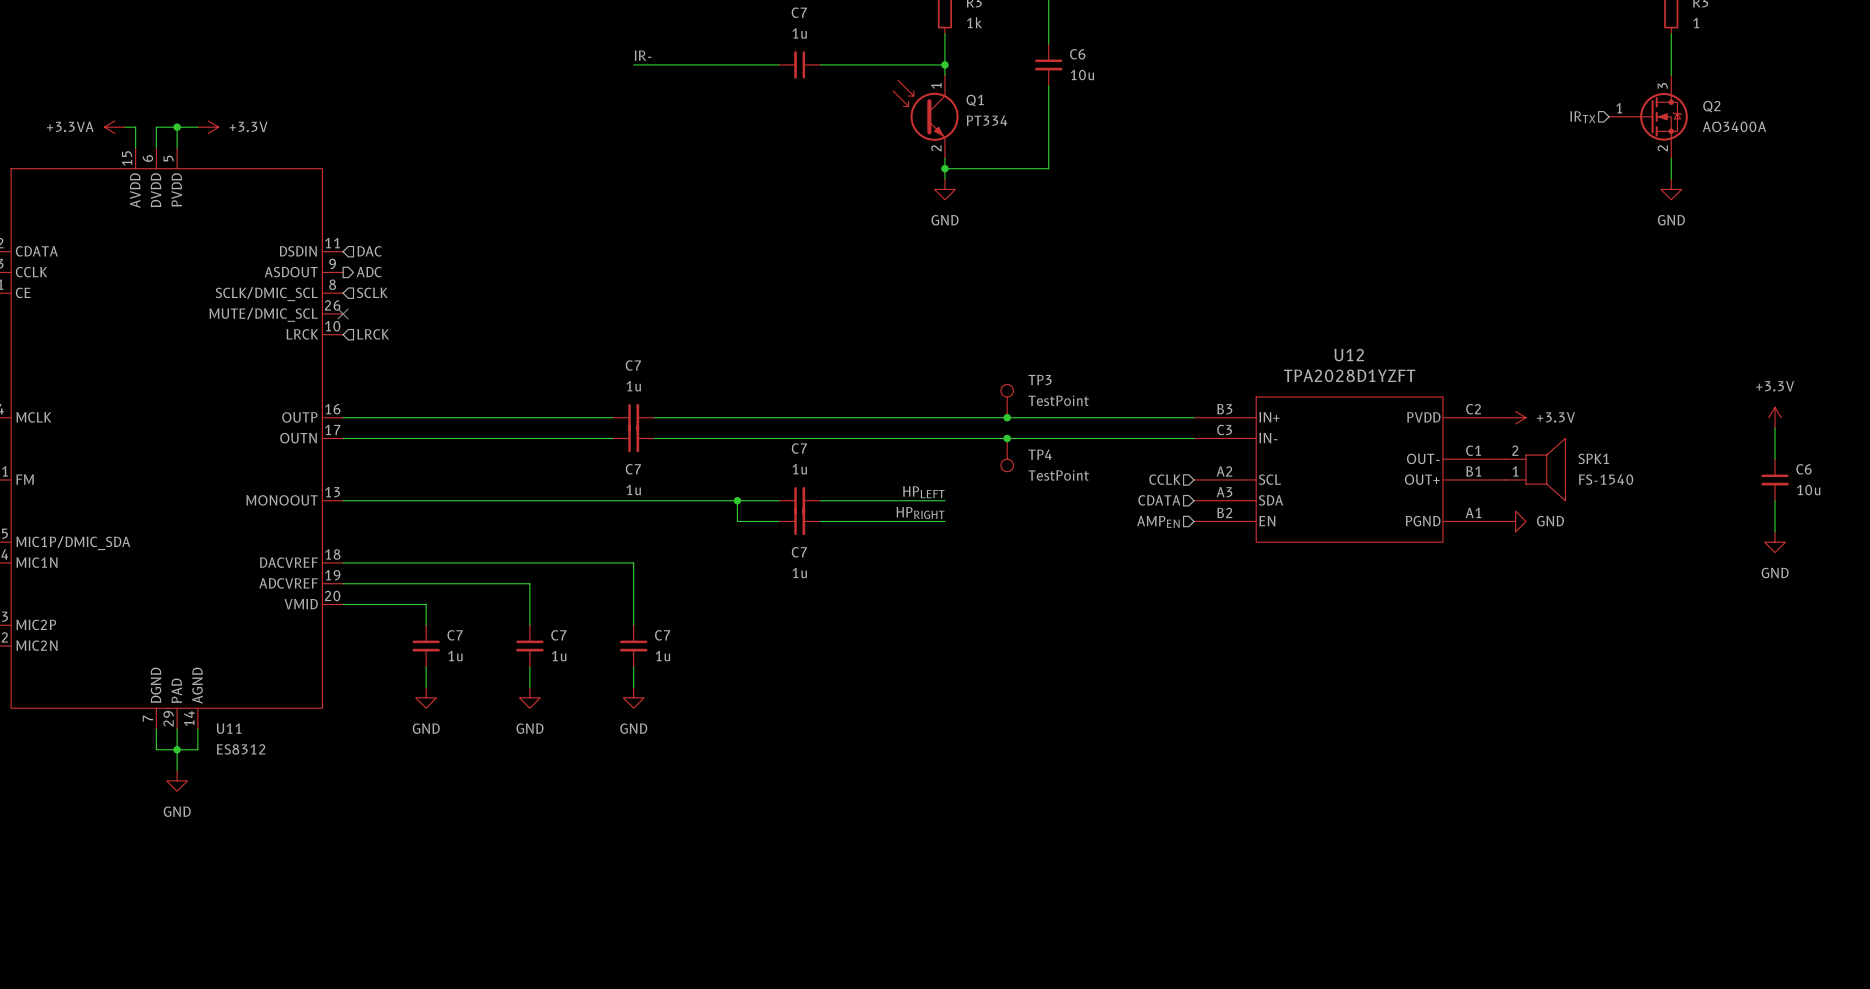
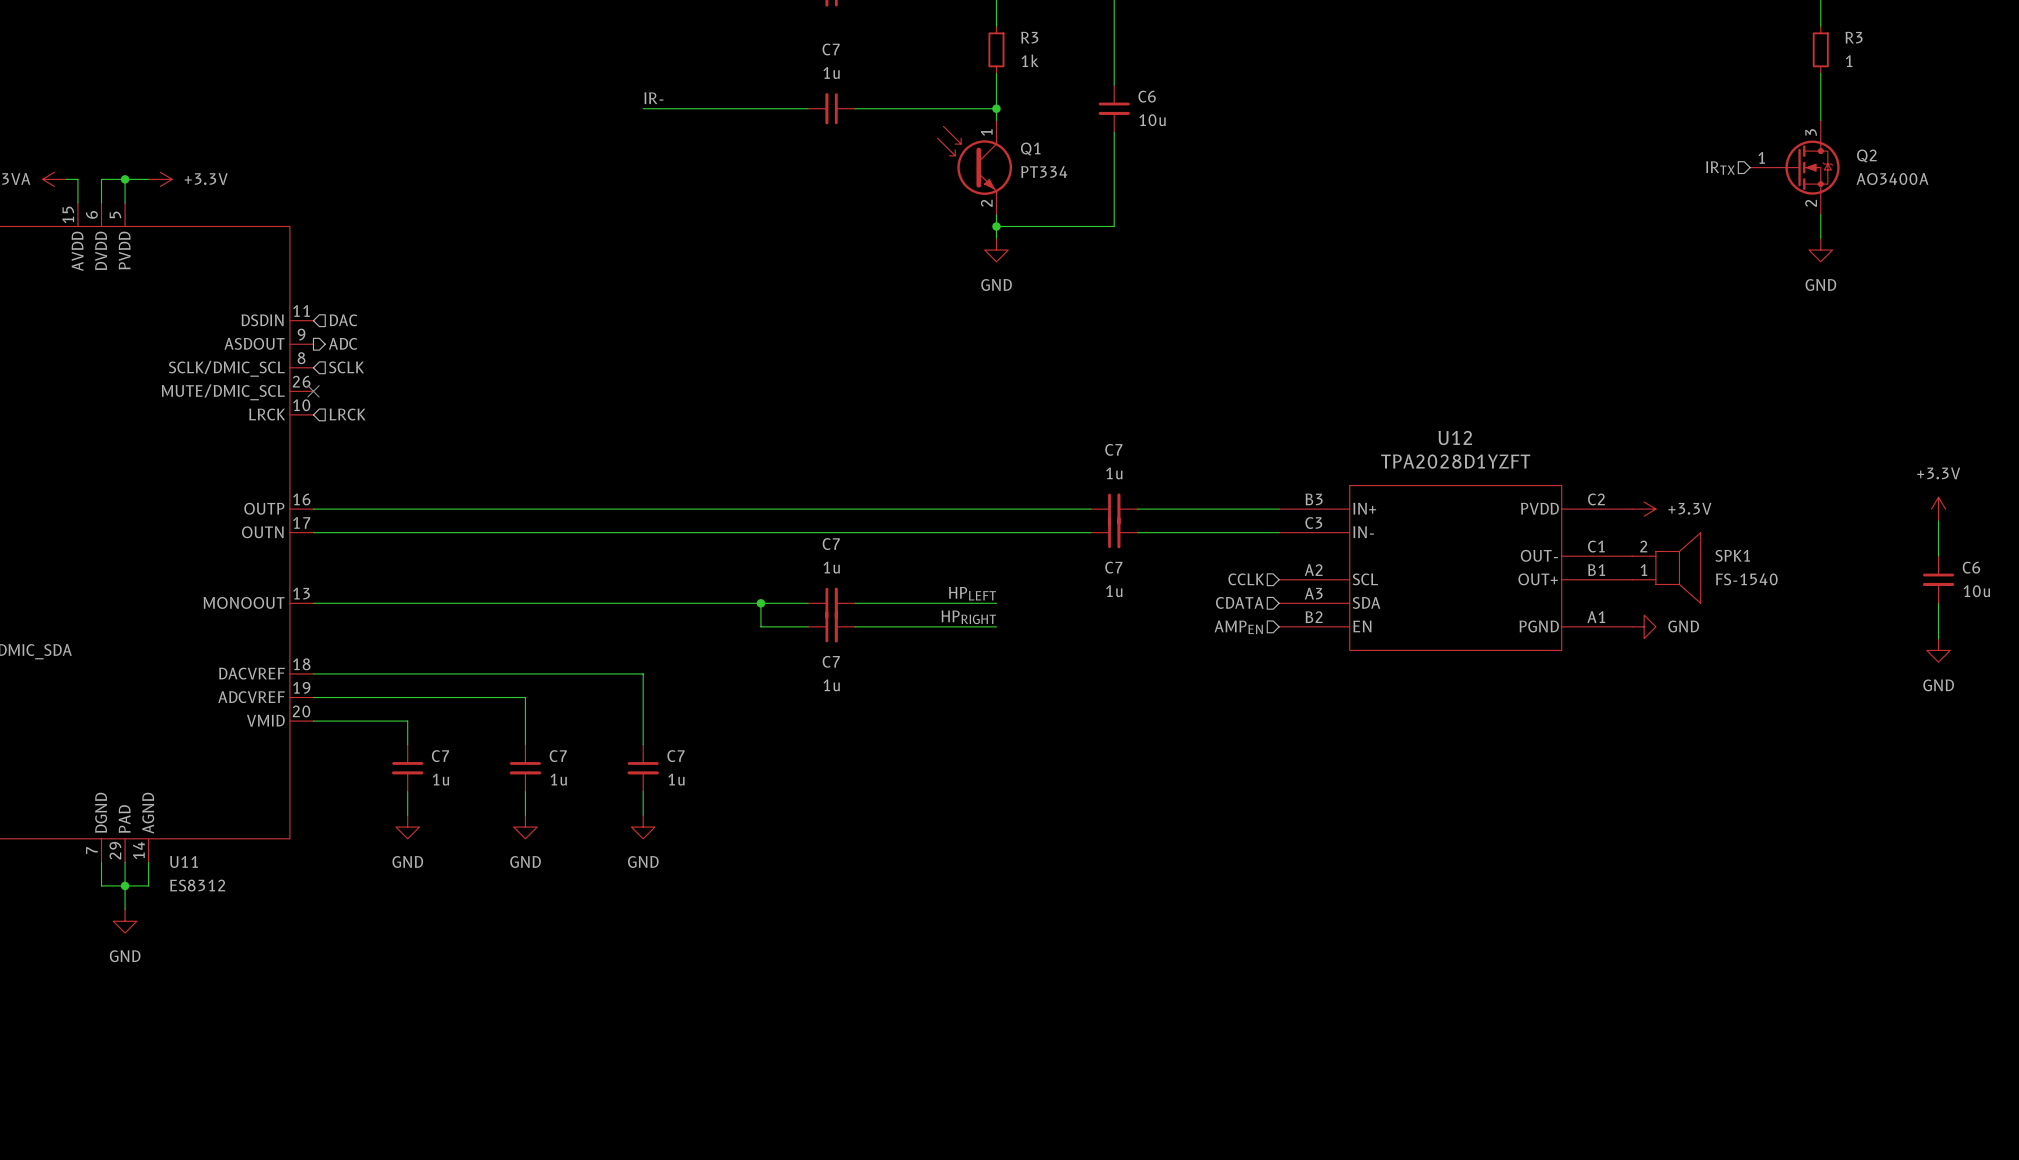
TP3: TestPoint (1007, 401) -> none
C7: 1u (633, 417) -> none
junction: (1007, 417) -> none
C7: none -> 1u (1114, 509)
C7: 1u (633, 438) -> none
junction: (1007, 438) -> none
C7: none -> 1u (1114, 532)
TP4: TestPoint (1007, 455) -> none

